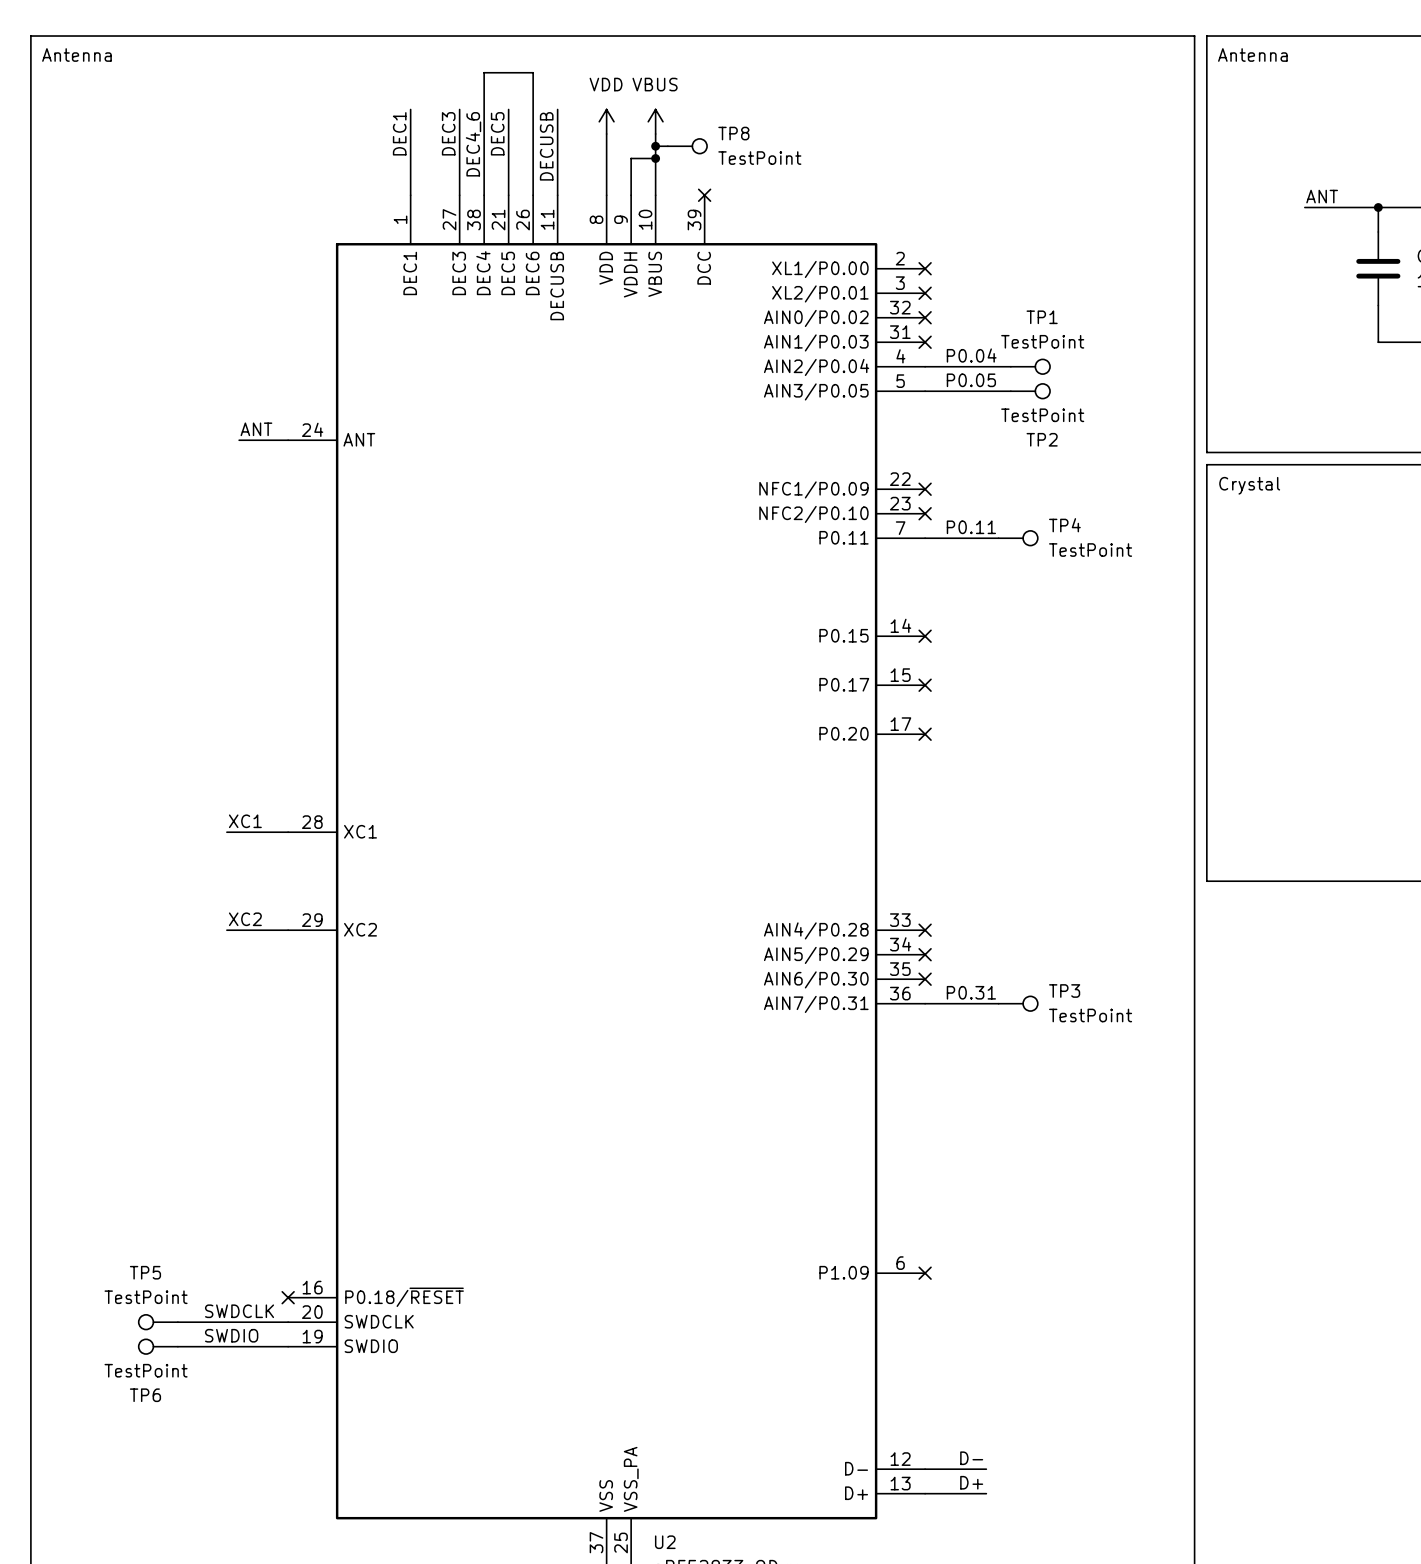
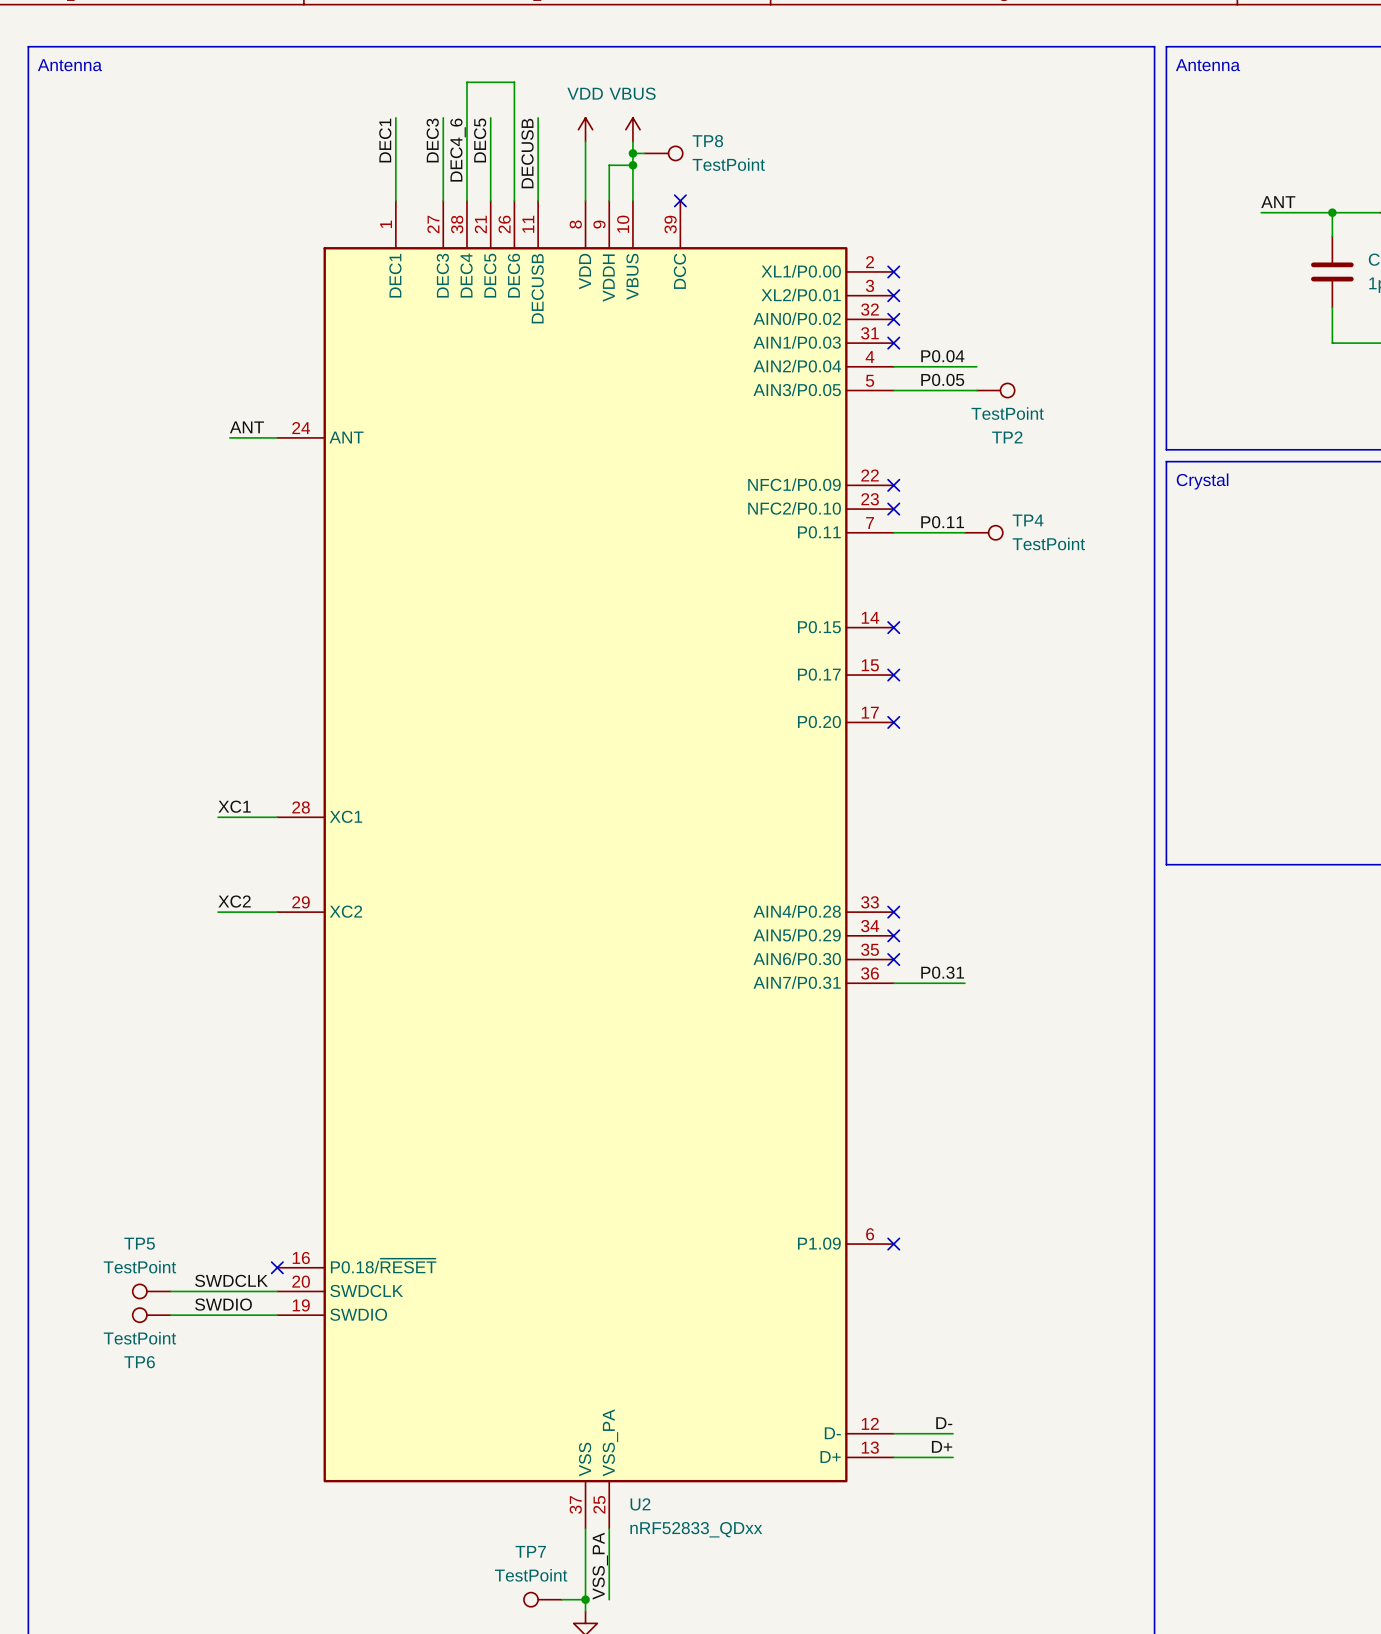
TP1: TestPoint (1030, 366) -> none
TP3: TestPoint (1018, 1003) -> none

